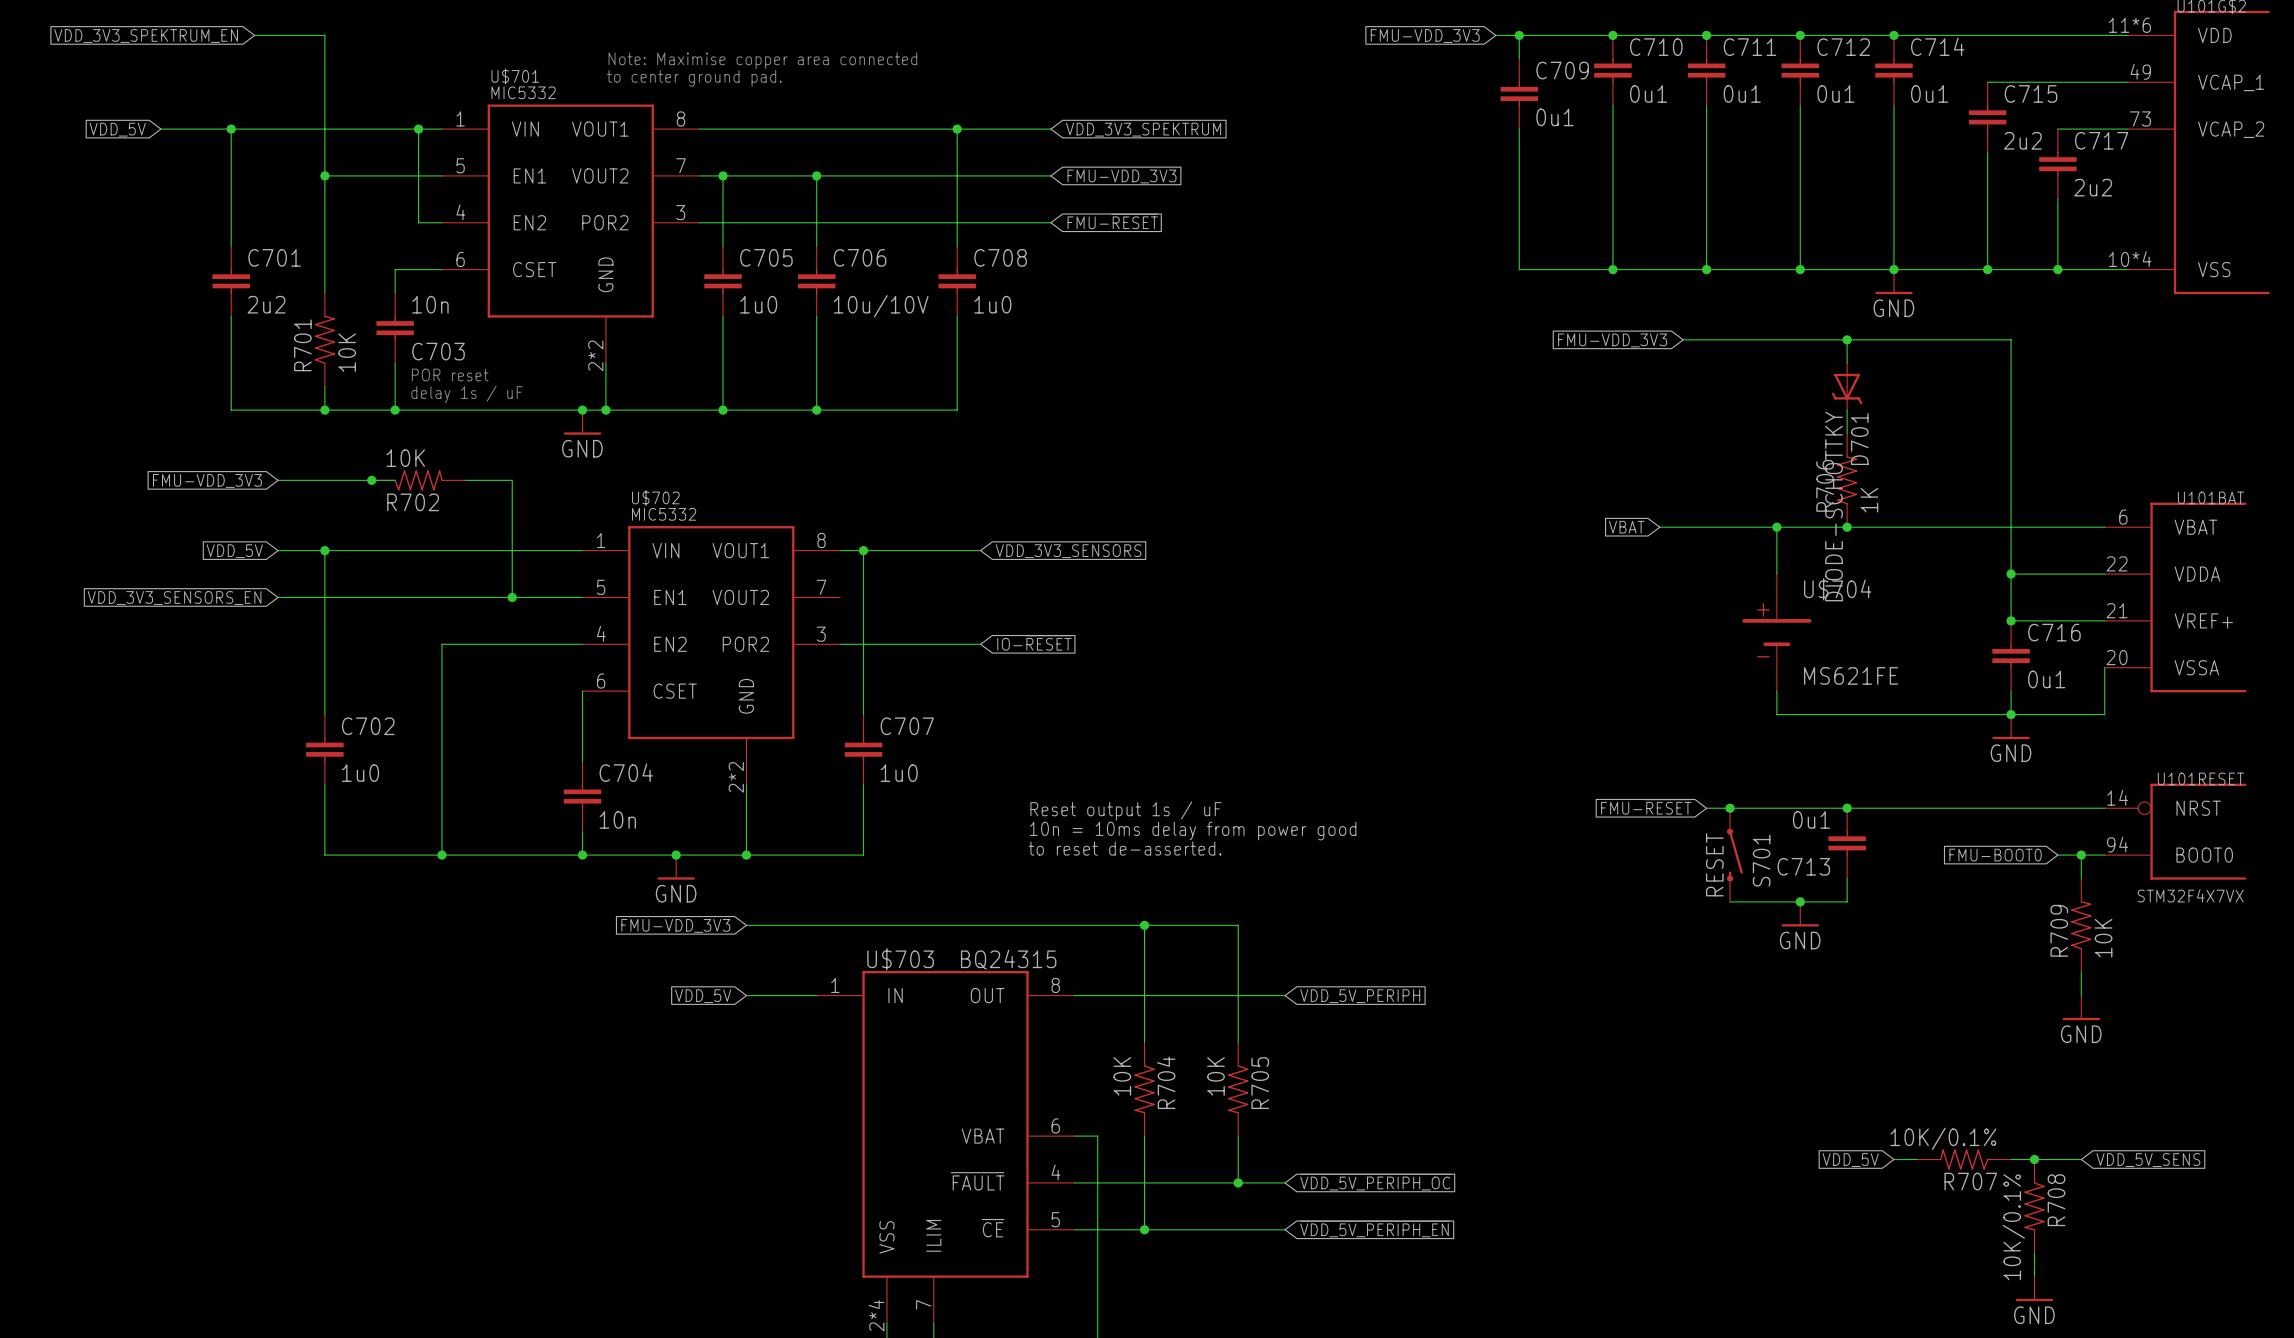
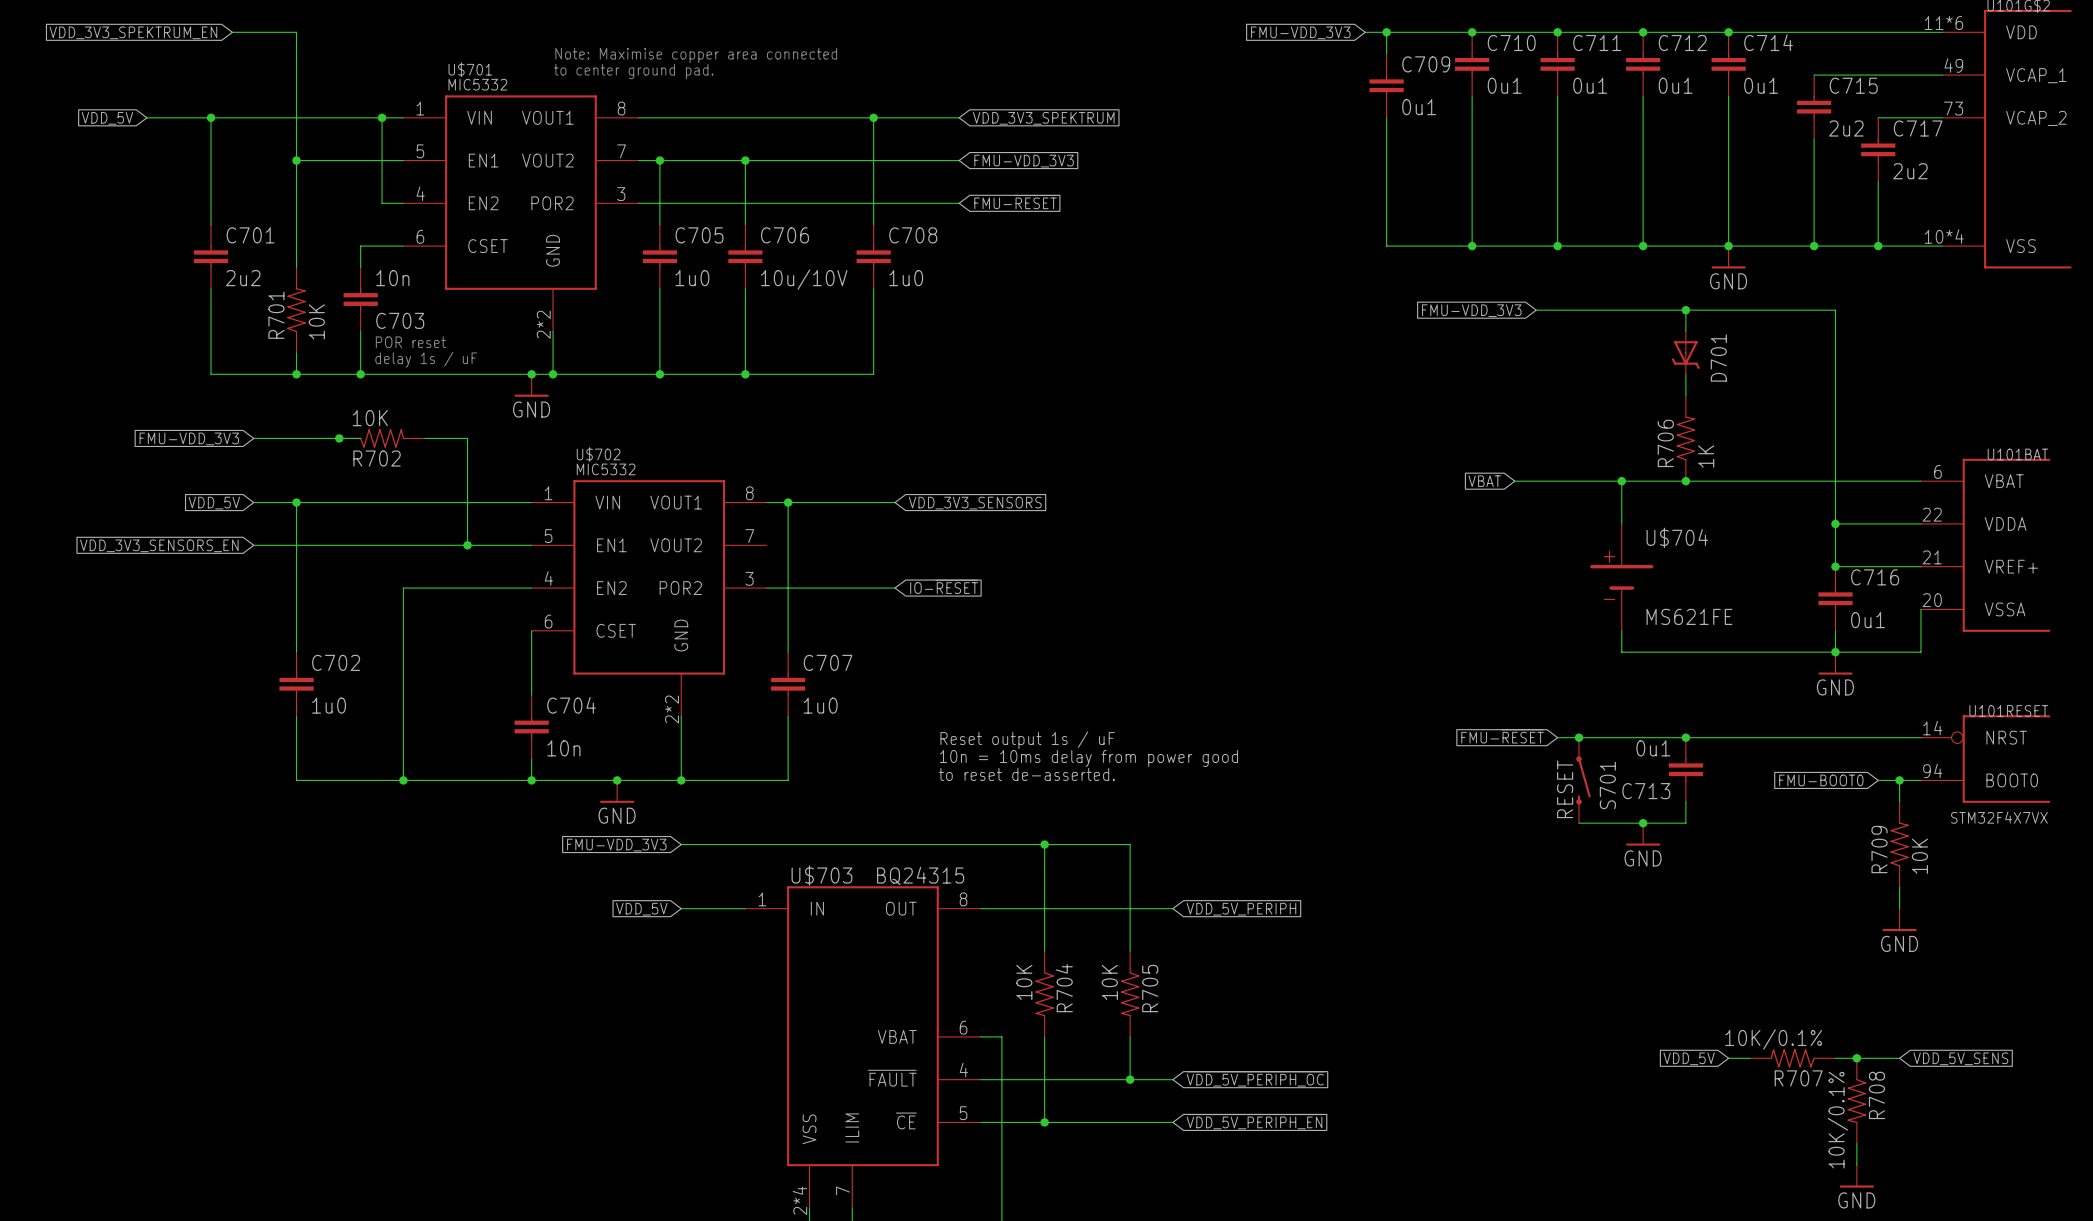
D701 name position: D701 (1859, 439) -> D701 (1718, 358)
D701 value: DIODE-SCHOTTKY (1834, 506) -> none

